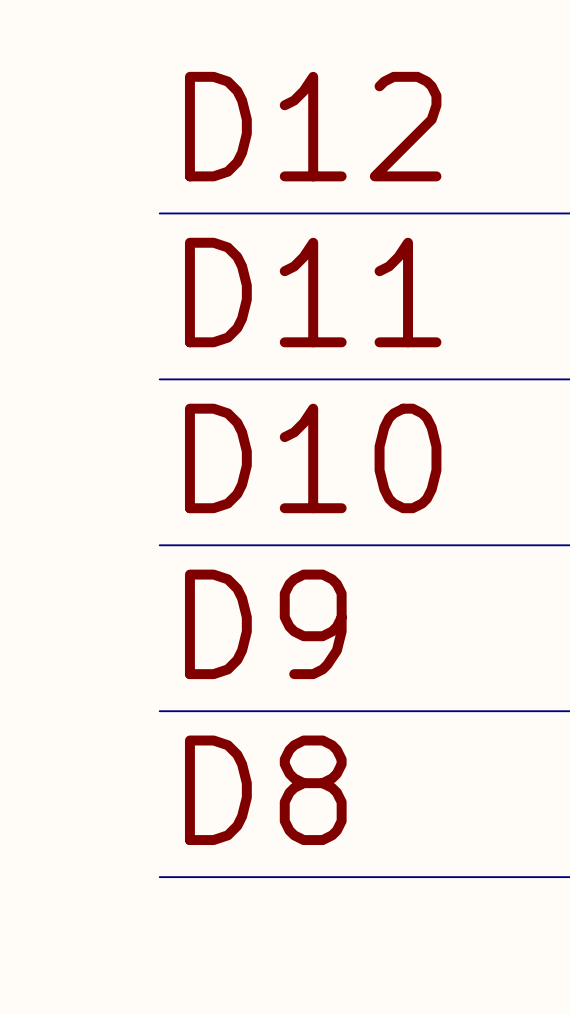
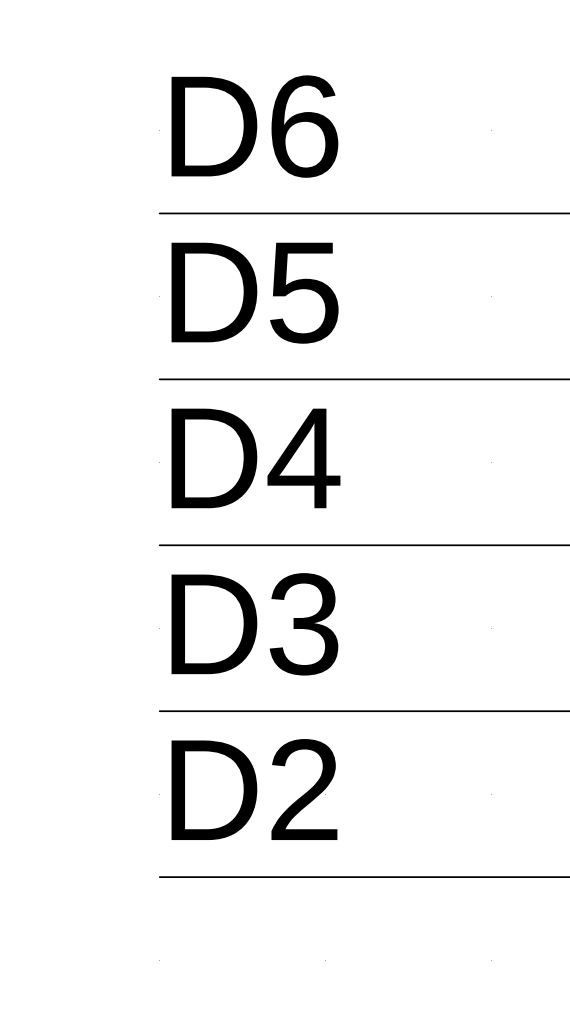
label: D12 (313, 126) -> D6 (254, 126)
label: D11 (313, 292) -> D5 (255, 293)
label: D10 (313, 458) -> D4 (256, 458)
label: D9 (265, 624) -> D3 (254, 624)
label: D8 (265, 790) -> D2 (254, 789)

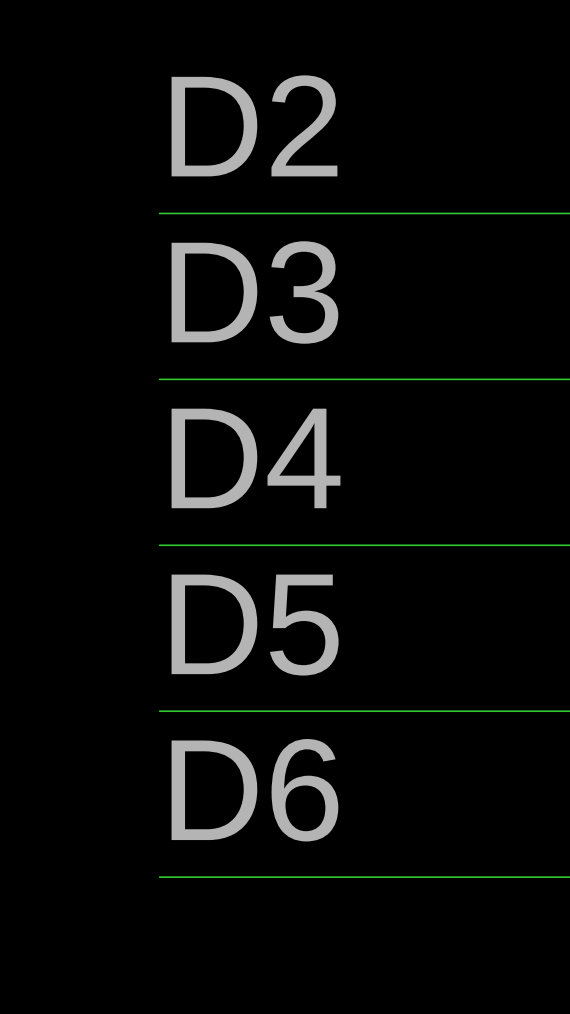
label: D6 (254, 126) -> D2 (254, 125)
label: D5 (255, 293) -> D3 (254, 292)
label: D3 (254, 624) -> D5 (255, 625)
label: D2 (254, 789) -> D6 (254, 790)

